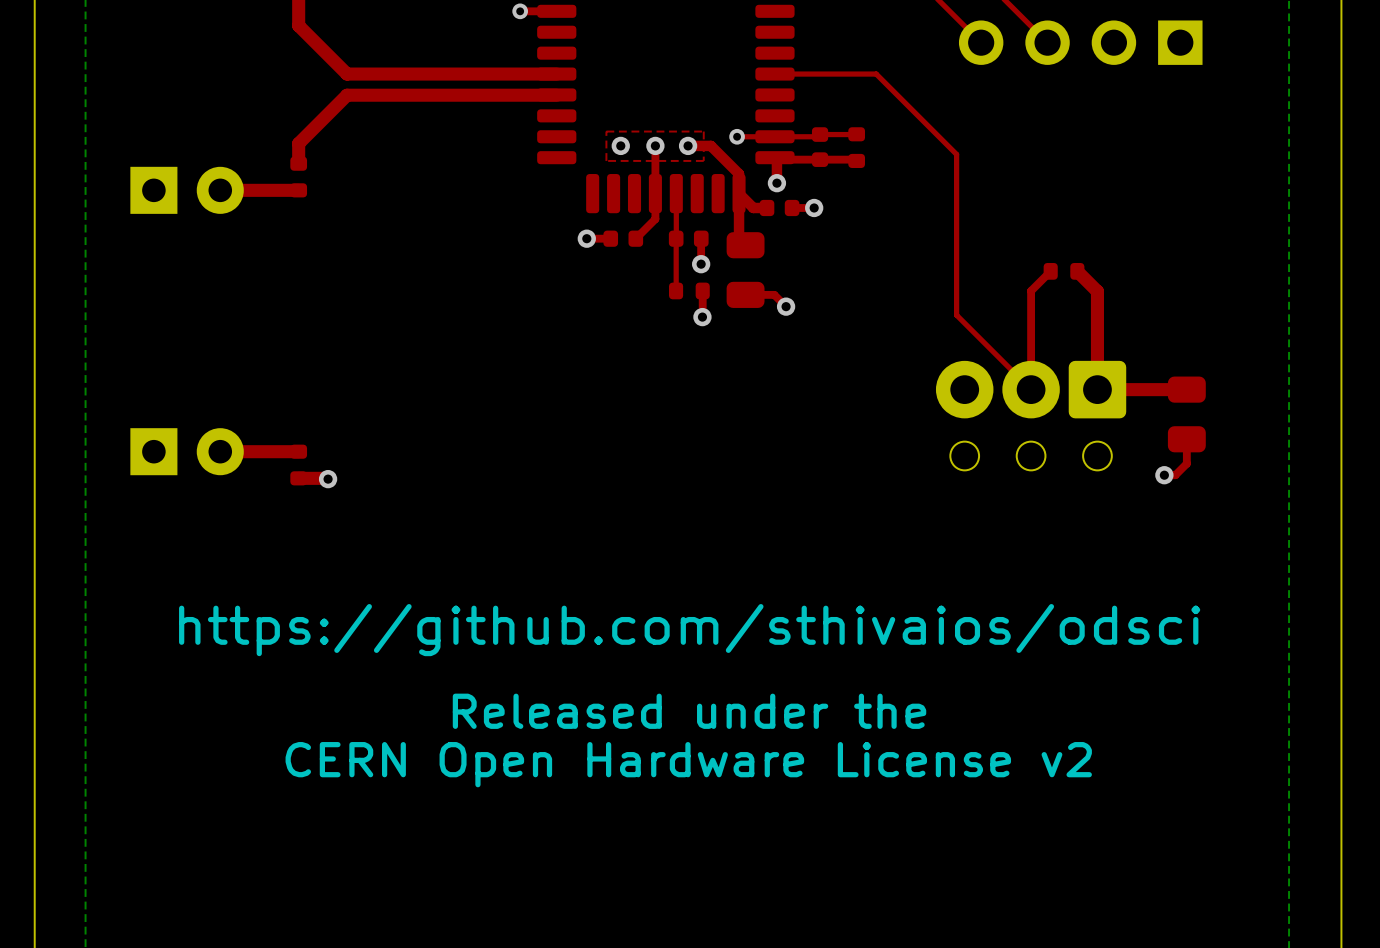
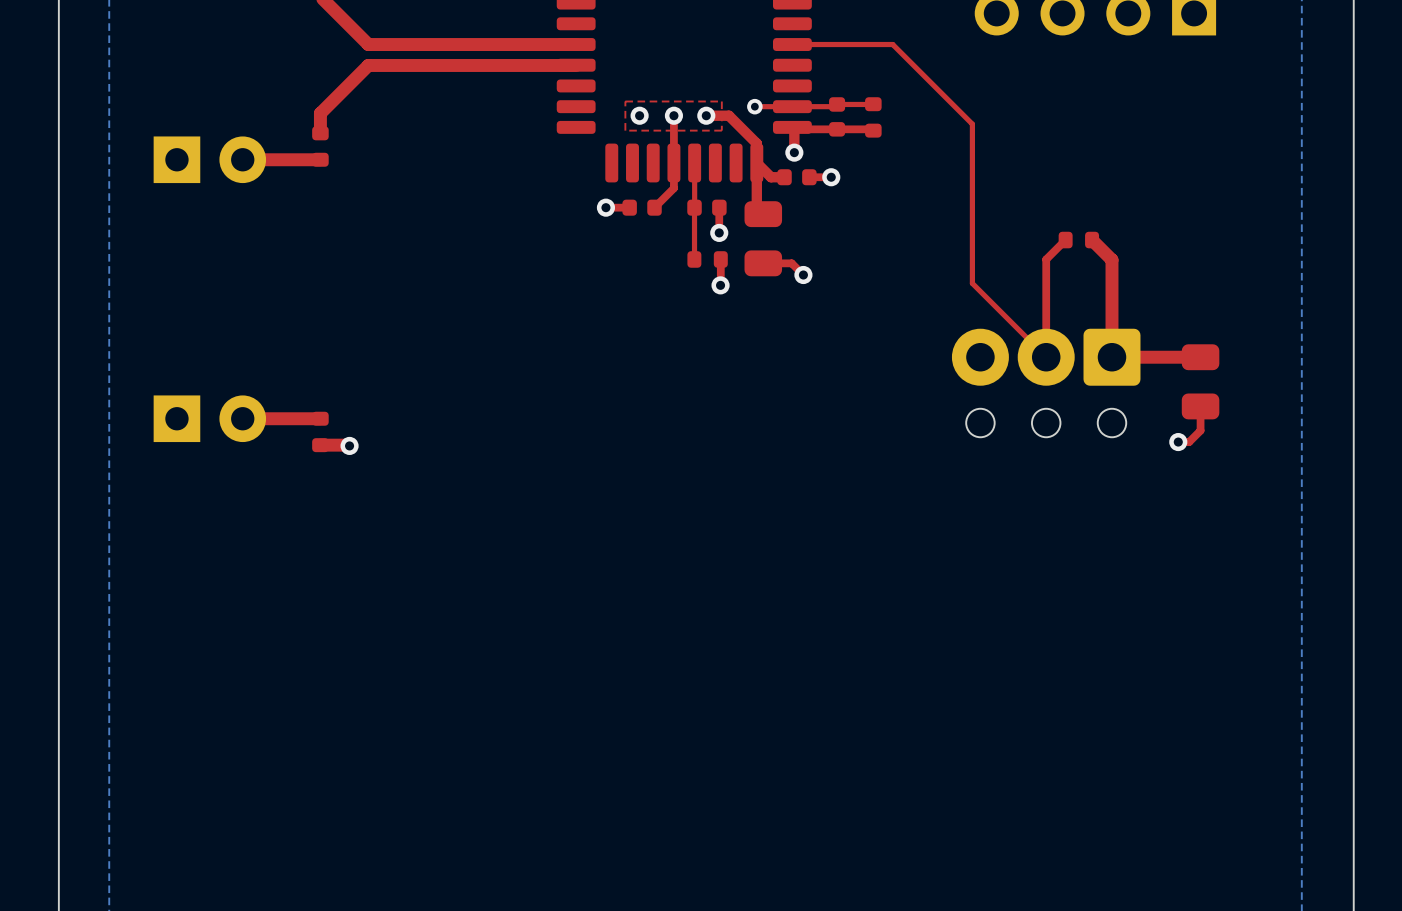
text: https://github.com/sthivaios/odsci (689, 630) -> none
text: Released under the (689, 711) -> none
text: CERN Open Hardware License v2 (688, 764) -> none

